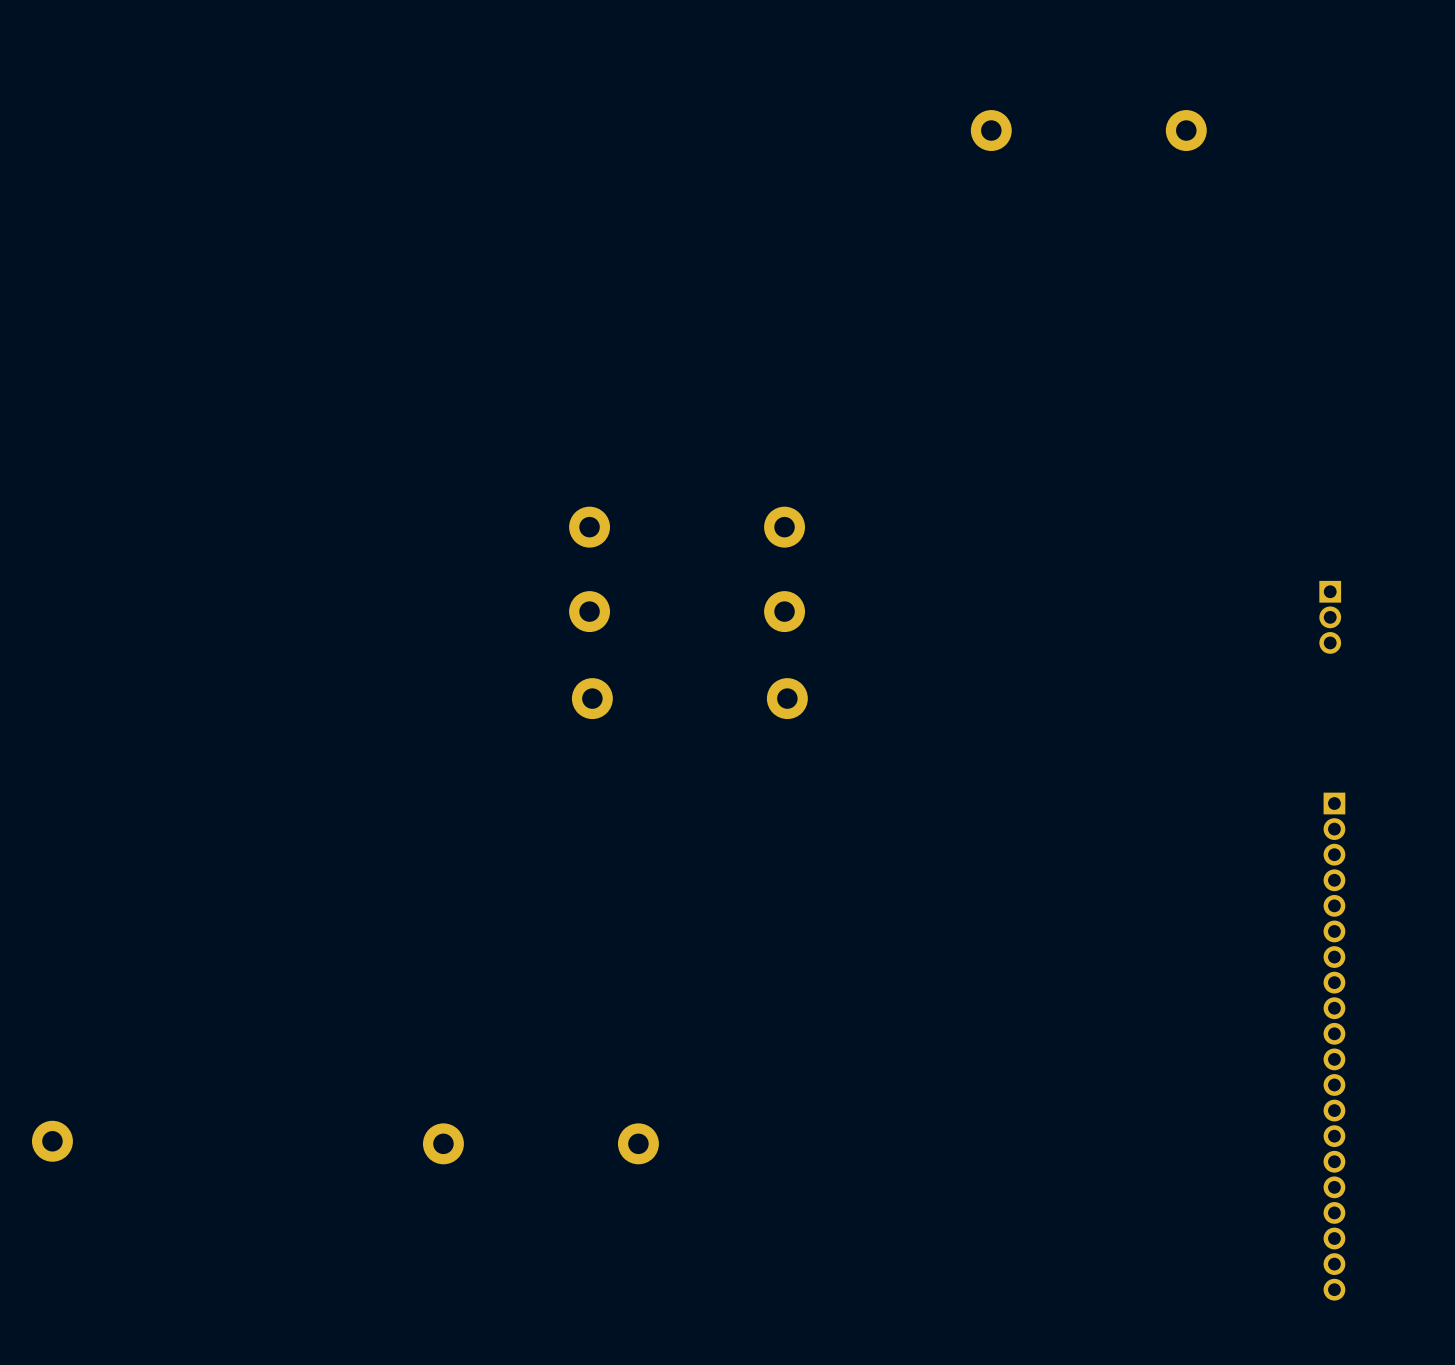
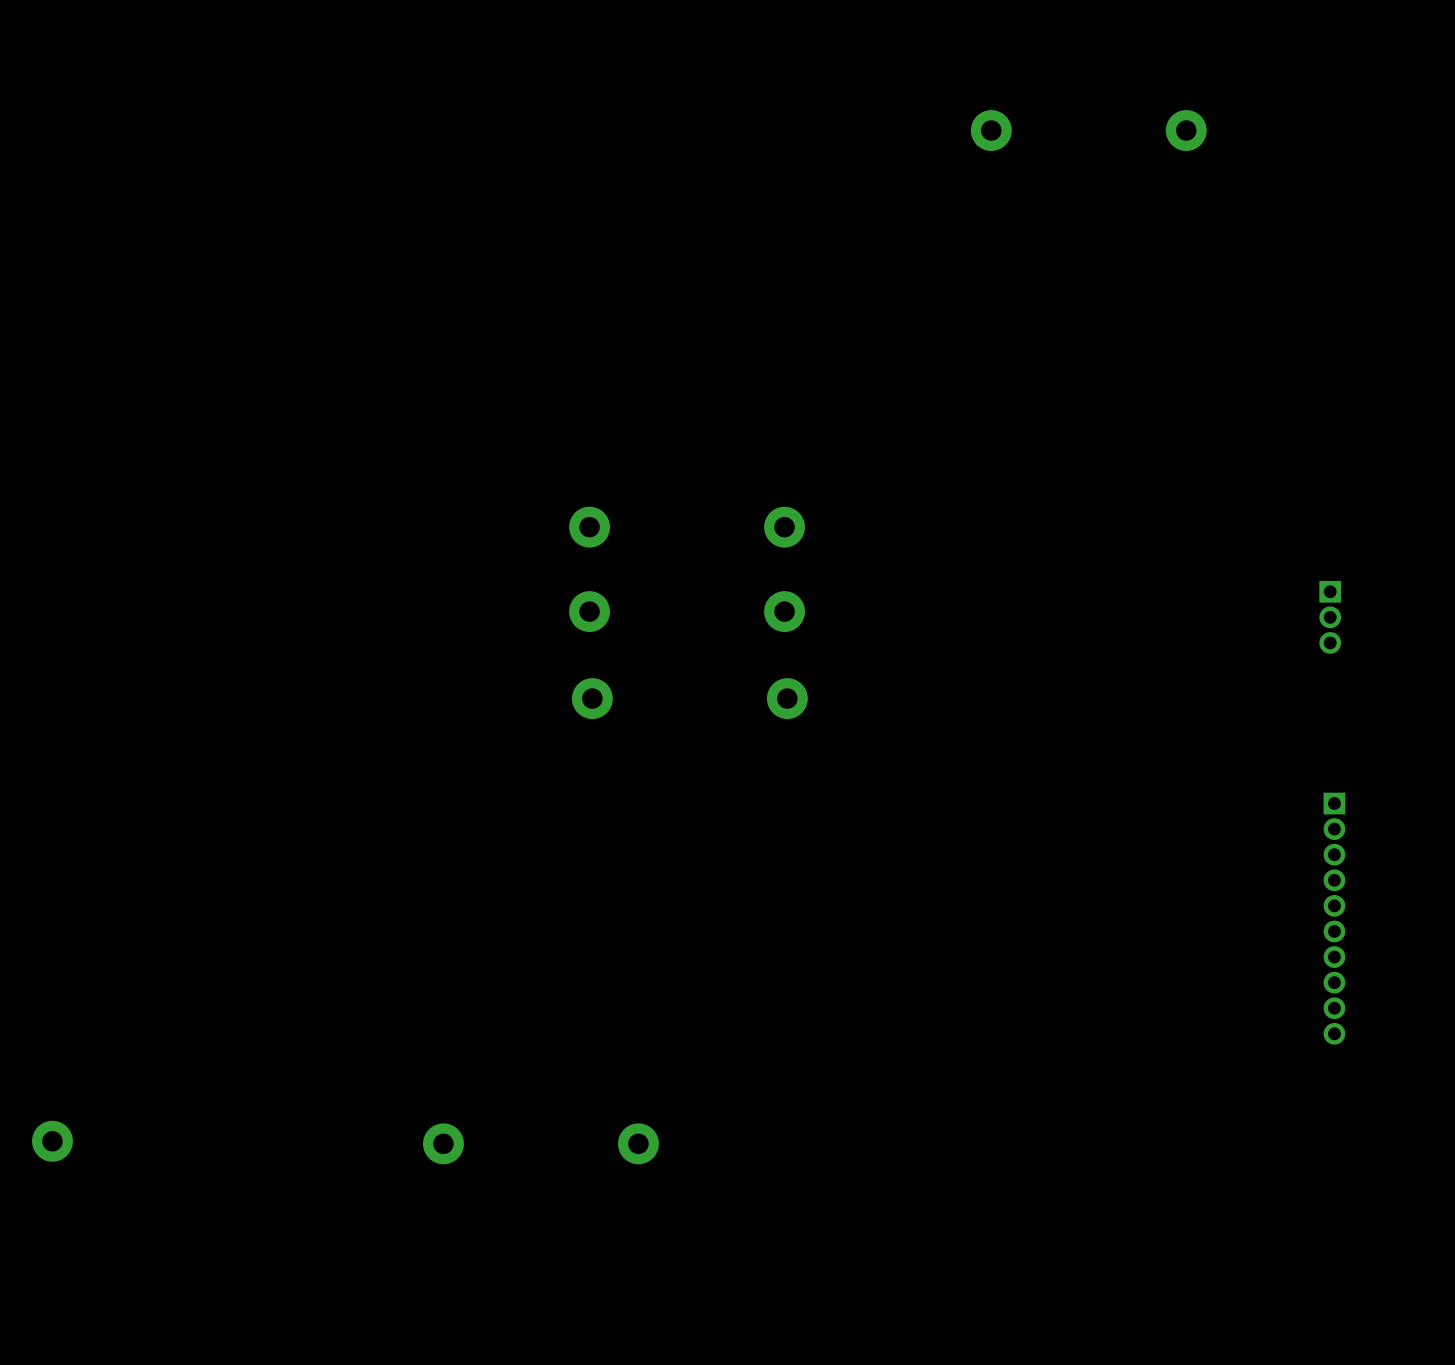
part: (1334, 1046) -> none

